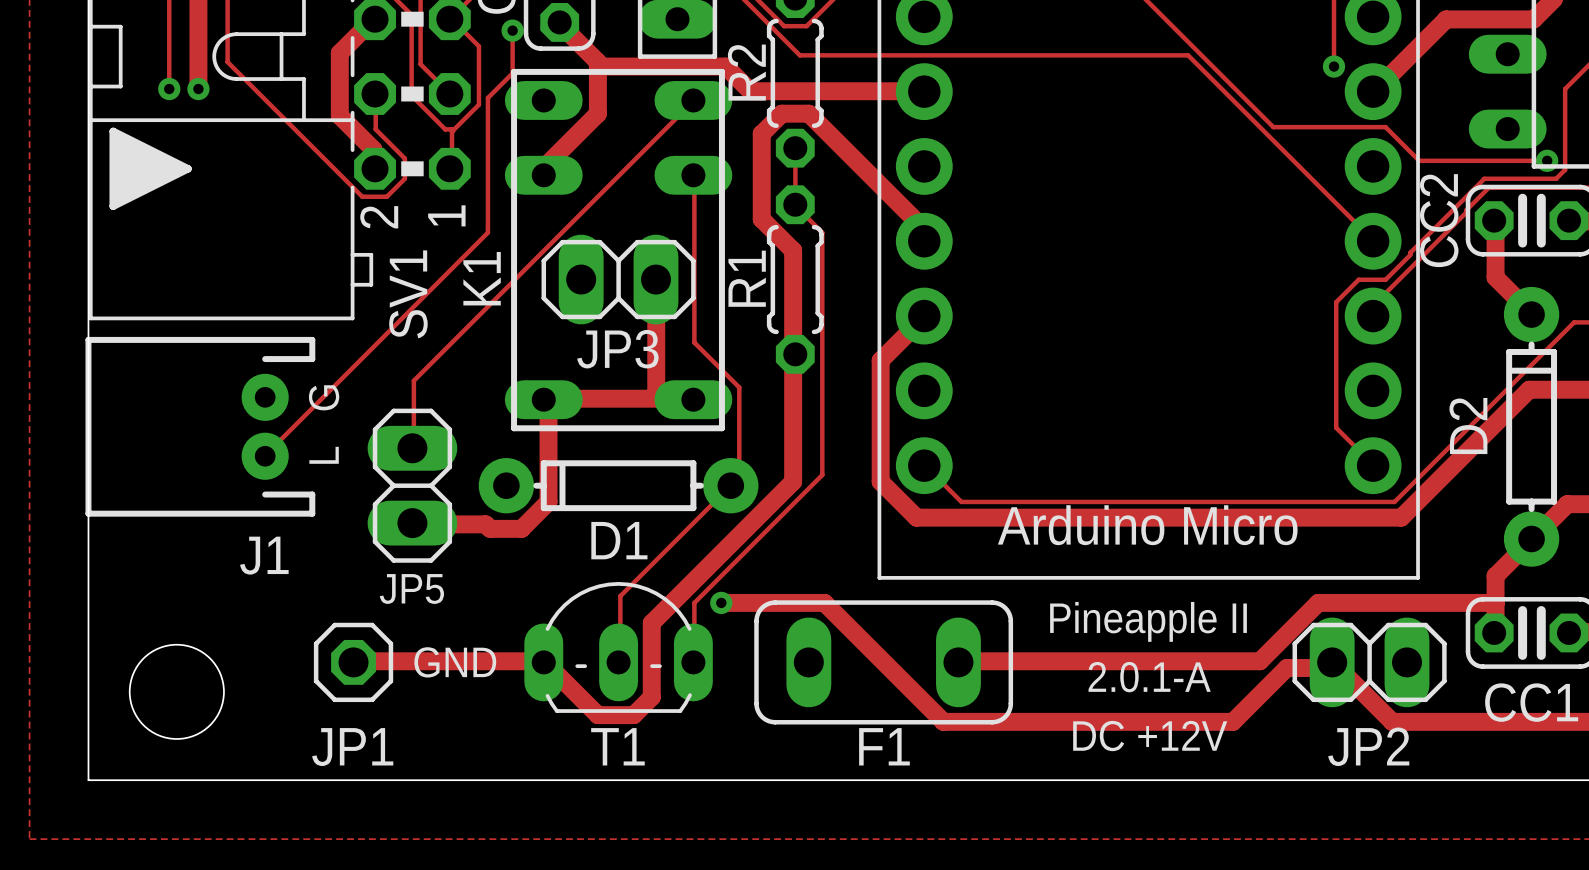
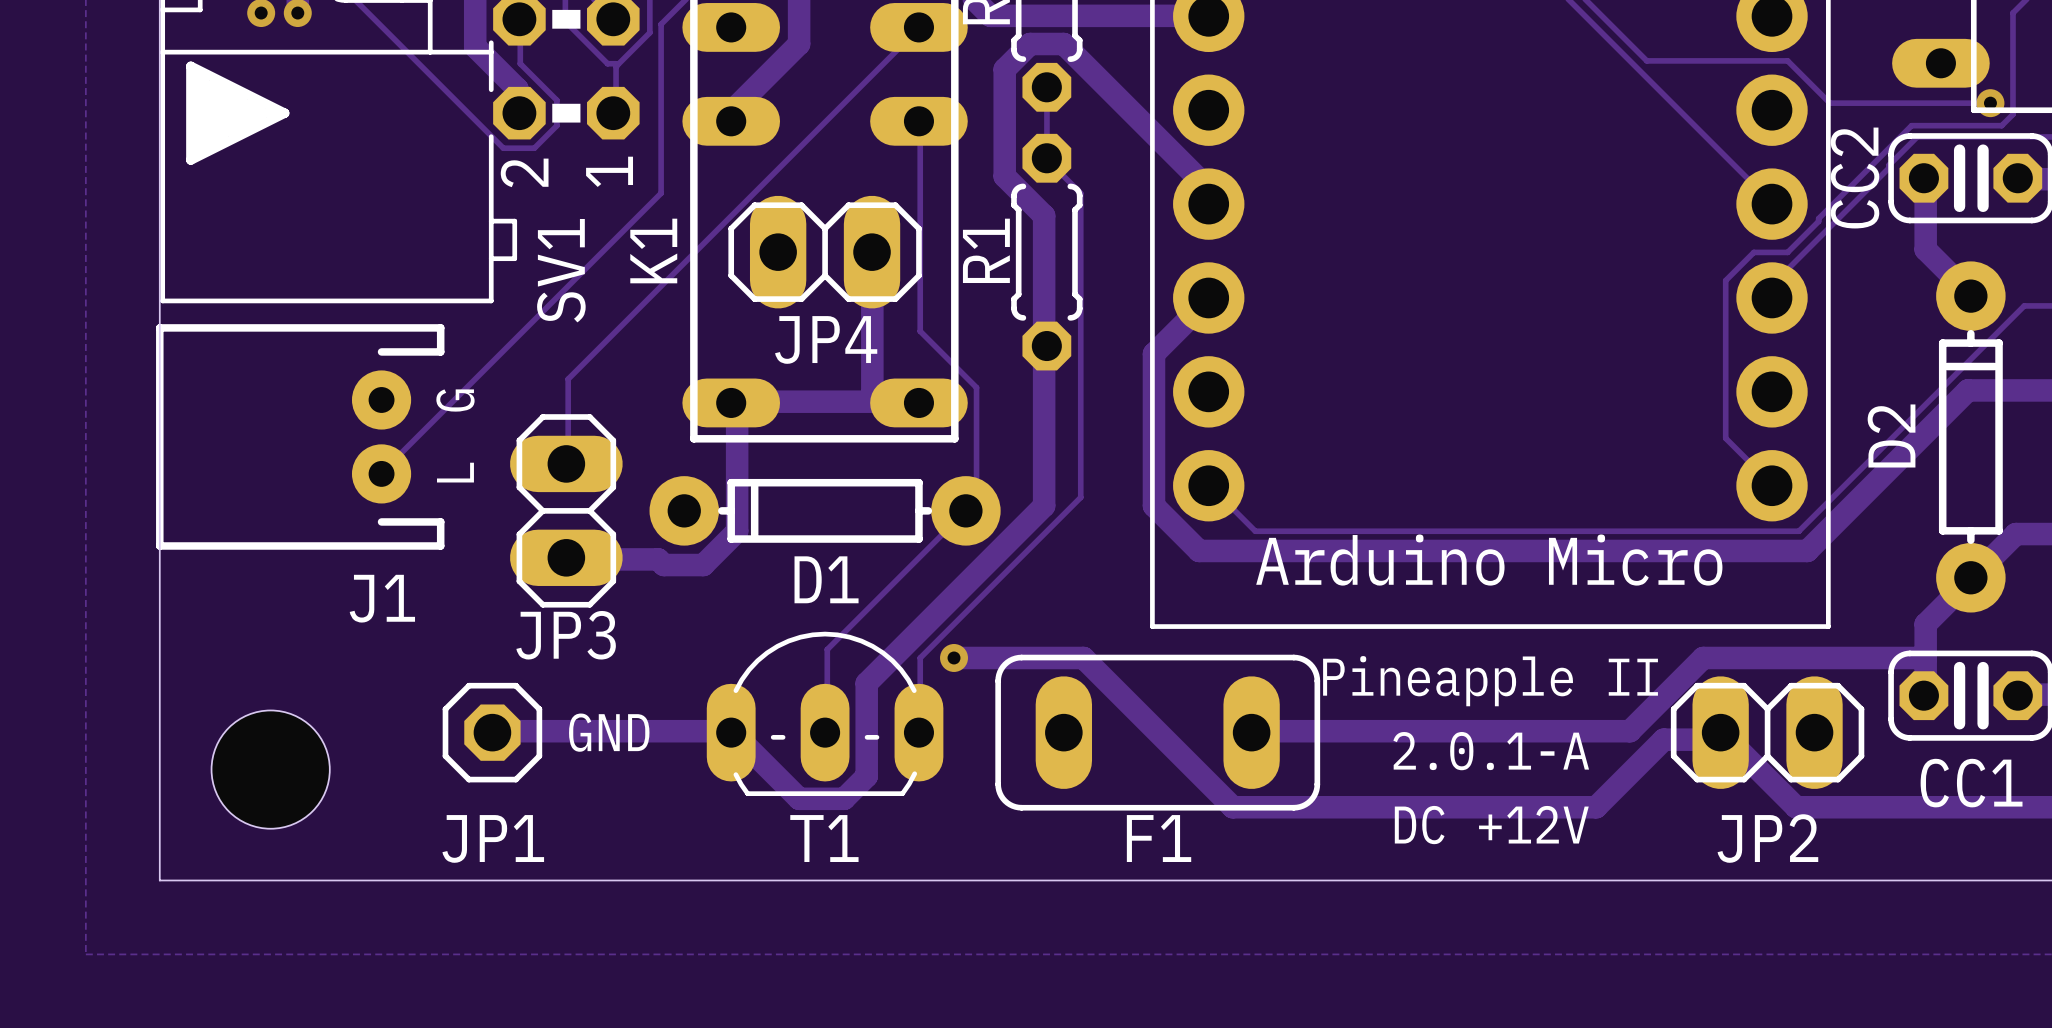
JP3 name: JP3 (617, 349) -> JP4 (826, 339)
JP5 name: JP5 (411, 588) -> JP3 (566, 635)

